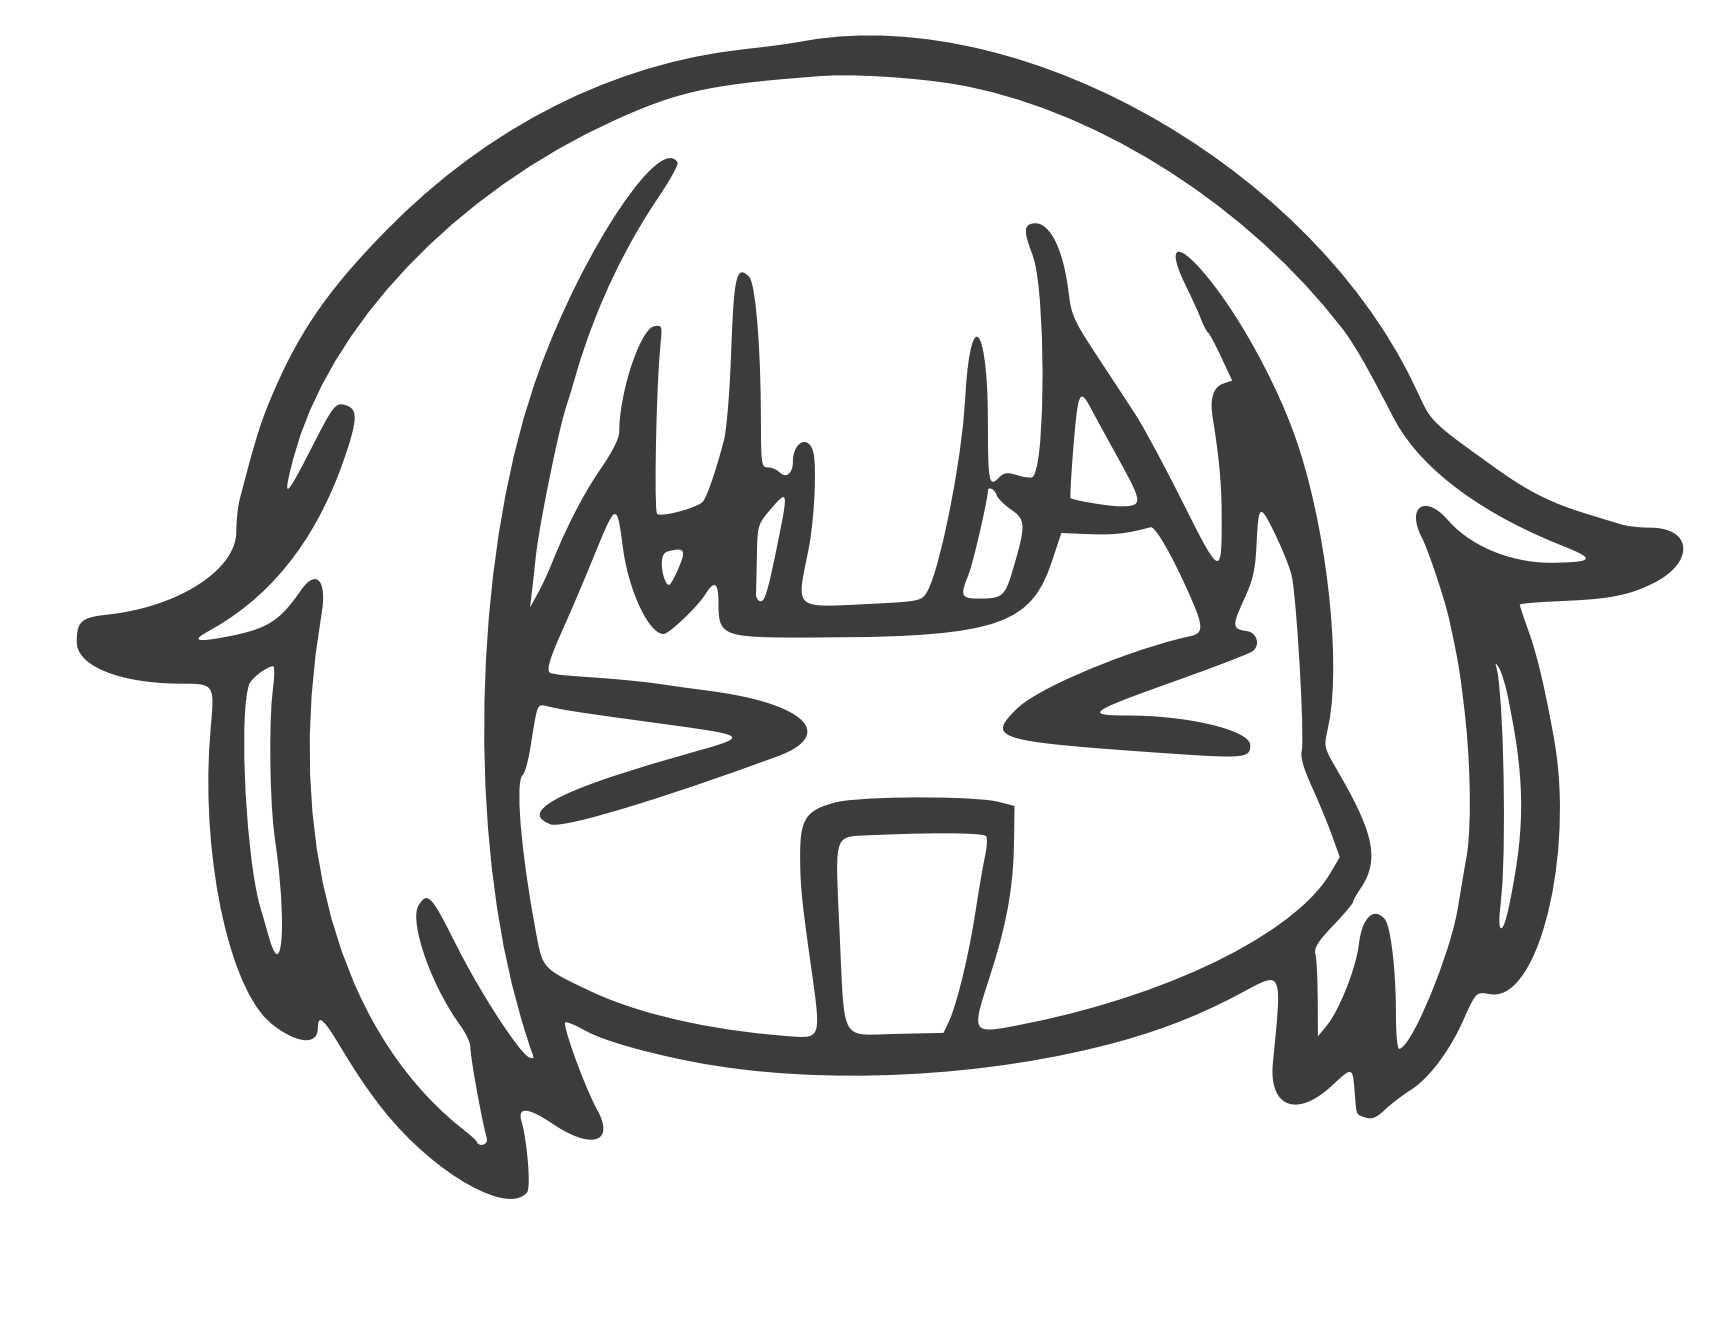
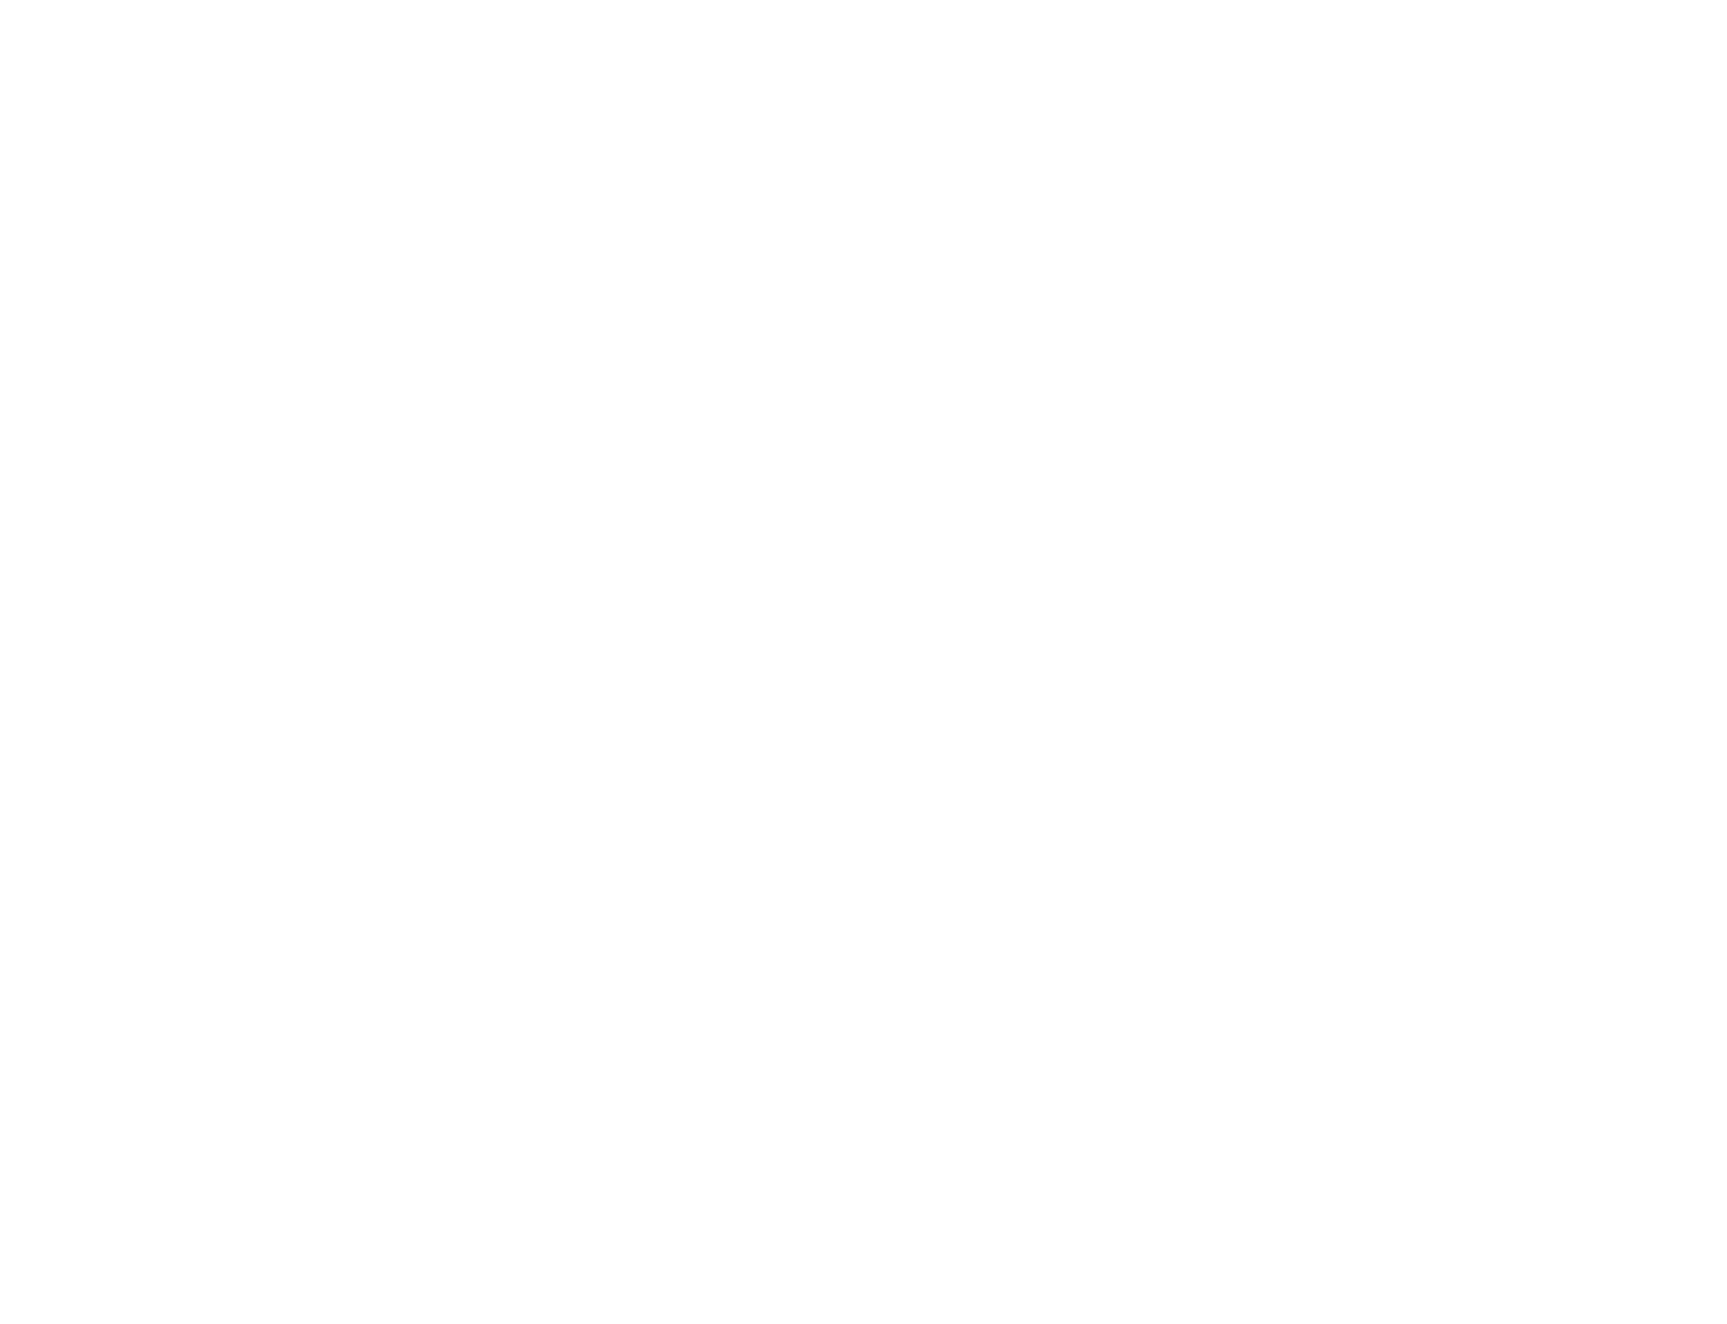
drawing: [76, 35, 1684, 1199] -> none

